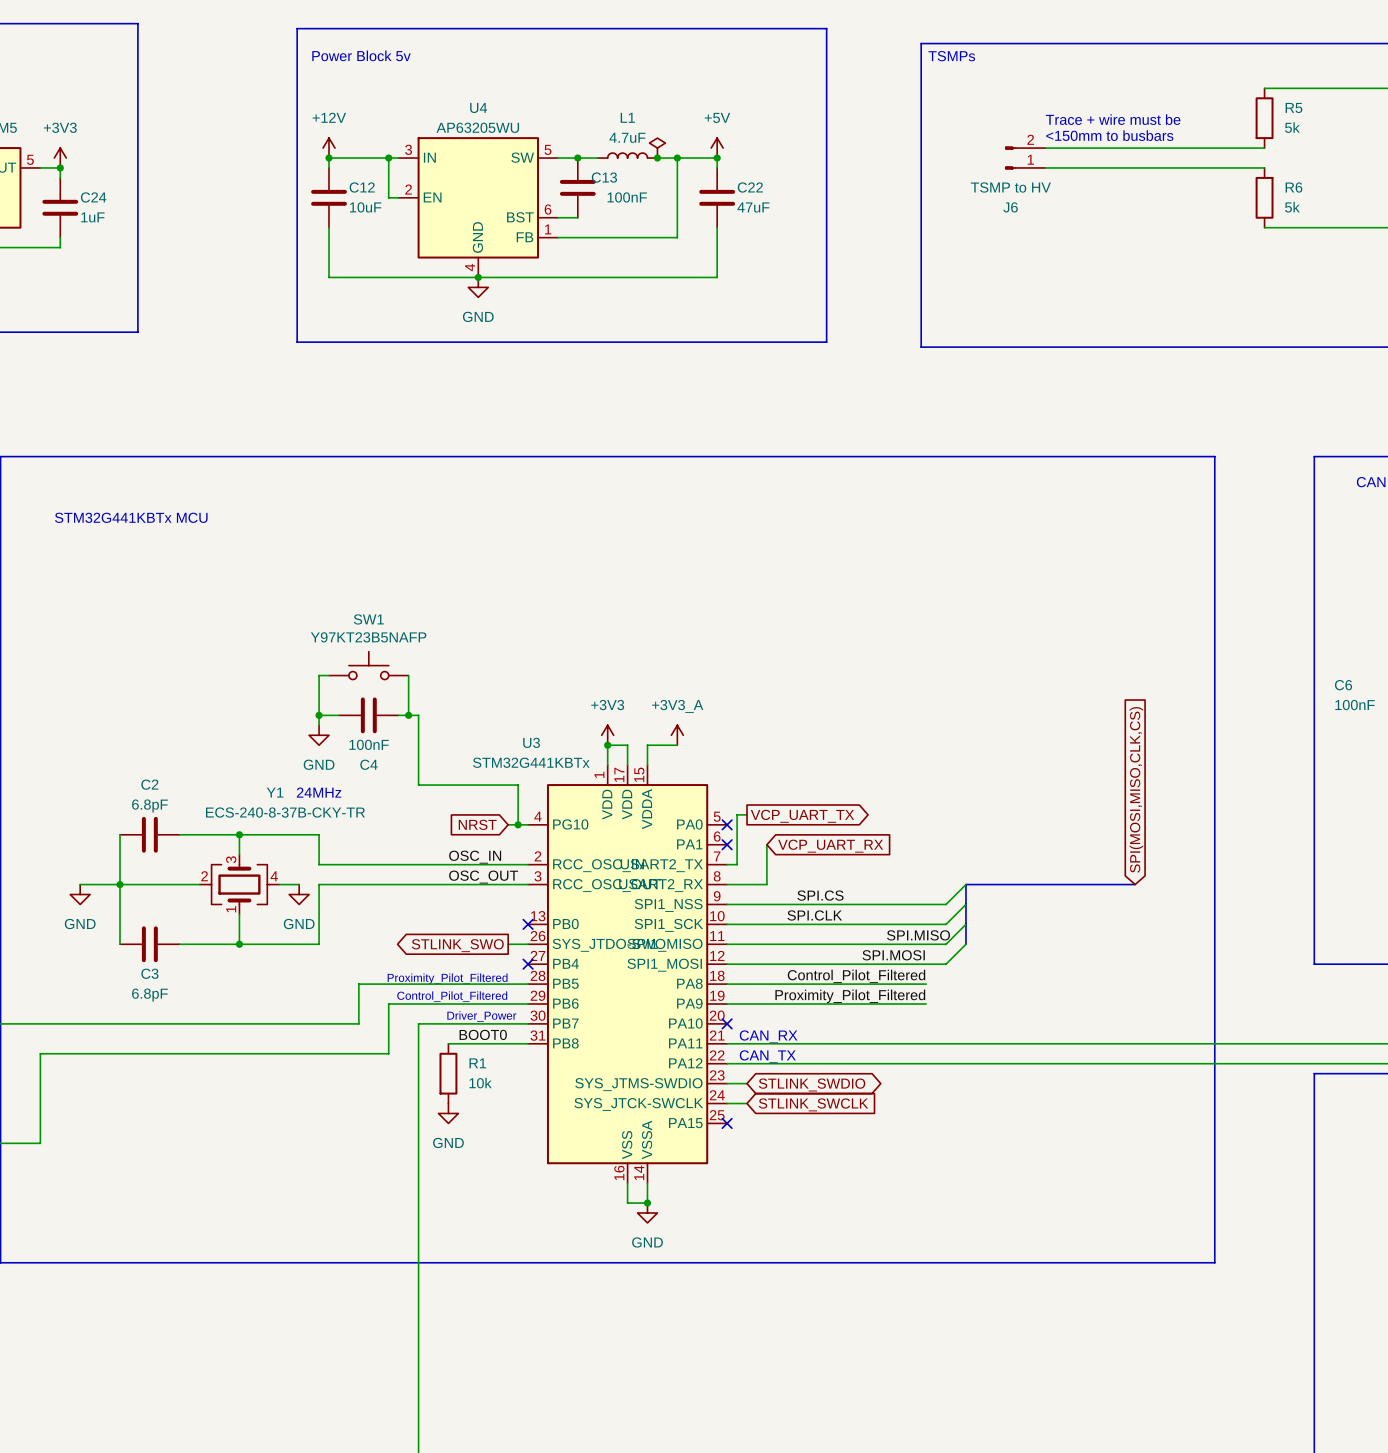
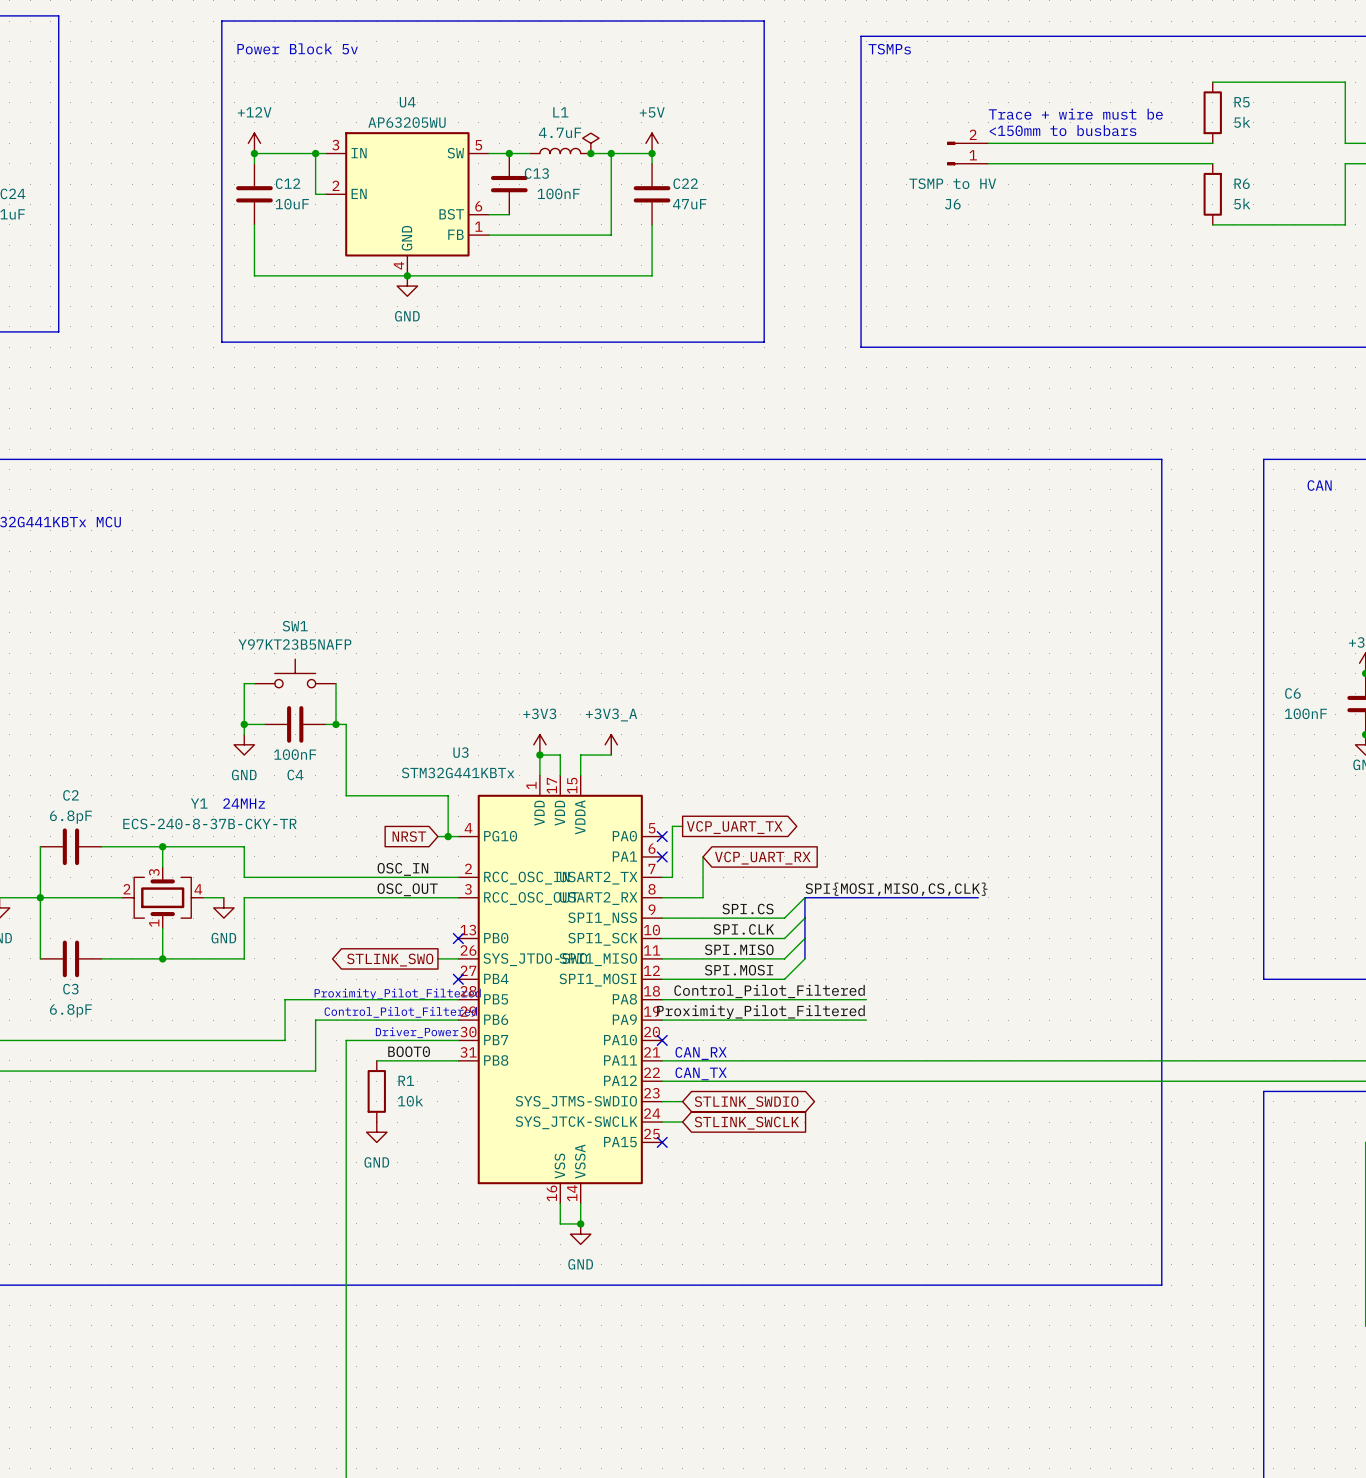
global label: SPI(MOSI,MISO,CLK,CS) (1136, 789) -> none
label: none -> SPI{MOSI,MISO,CS,CLK} (896, 889)
wire: (965, 884) (946, 904) (846, 904) -> (804, 897) (784, 918)
bus: (965, 884) (965, 944) -> (906, 897) (804, 897) (804, 958)
bus: (1035, 884) (1135, 884) -> none
label position: SPI.CS (820, 895) -> SPI.CS (747, 909)
wire: (965, 904) (946, 924) (846, 924) -> (804, 918) (784, 938)
label position: SPI.CLK (814, 915) -> SPI.CLK (743, 929)
wire: (965, 924) (946, 944) (846, 944) -> (804, 938) (784, 958)
label position: SPI.MISO (918, 935) -> SPI.MISO (739, 949)
wire: (965, 944) (946, 964) (846, 964) -> (804, 958) (784, 979)
label position: SPI.MOSI (893, 955) -> SPI.MOSI (739, 970)

